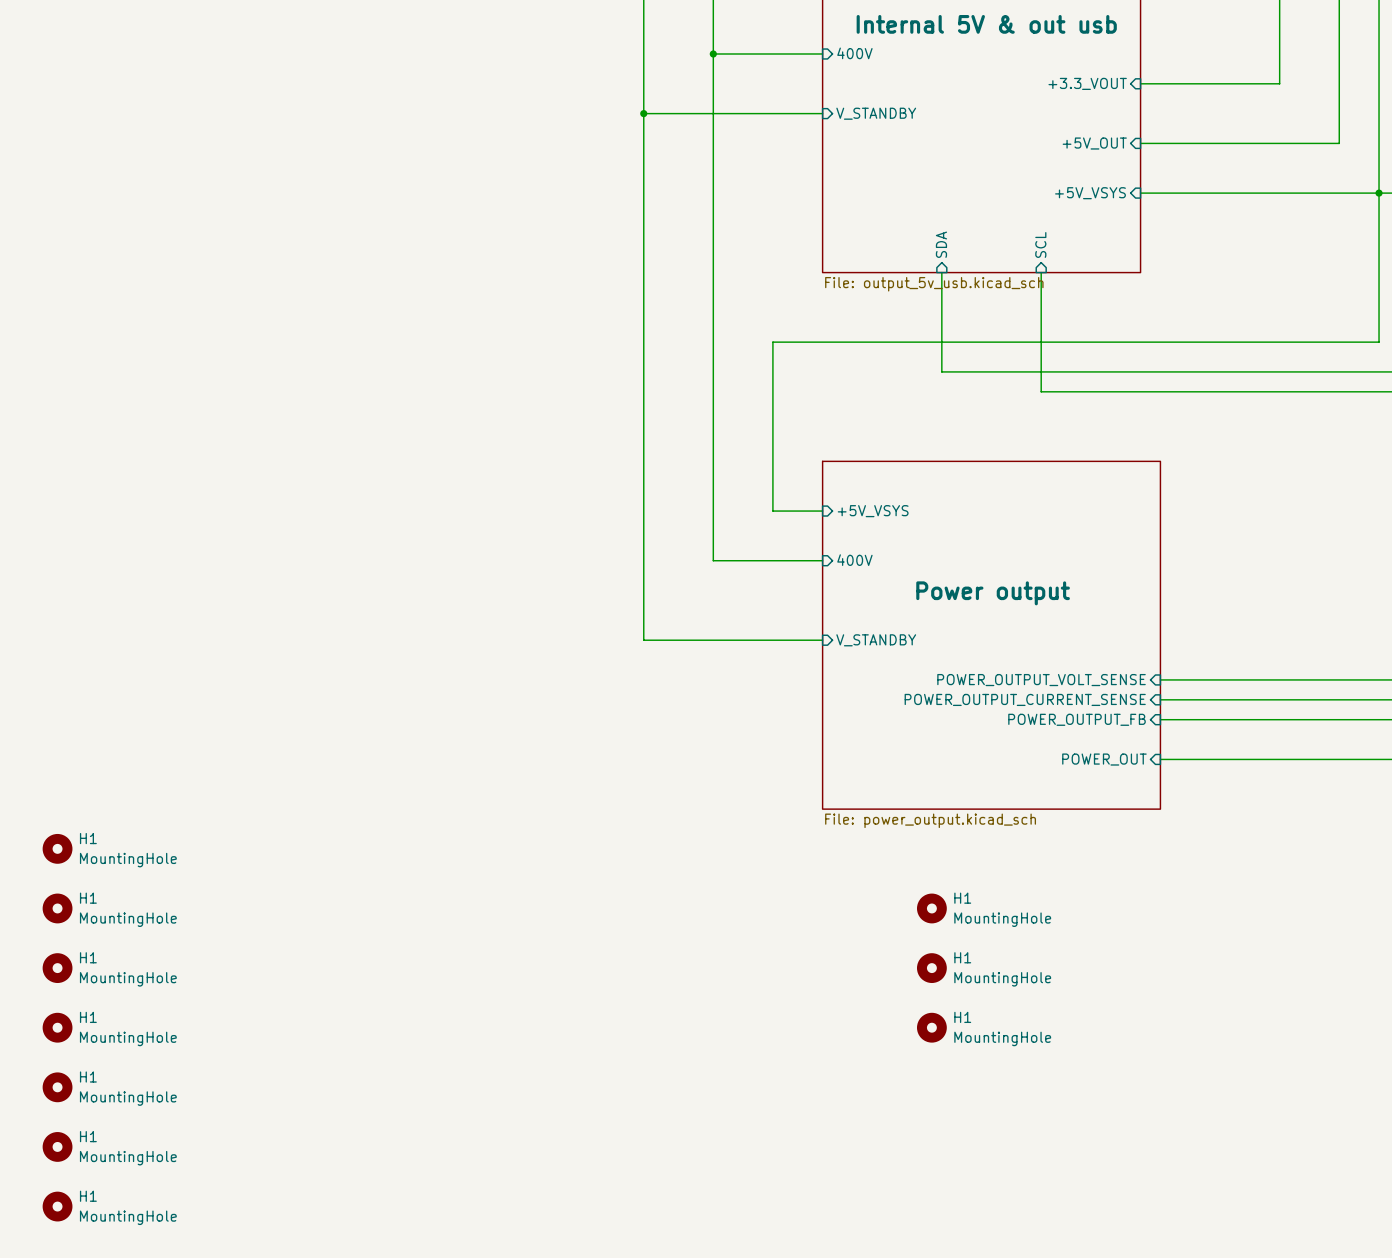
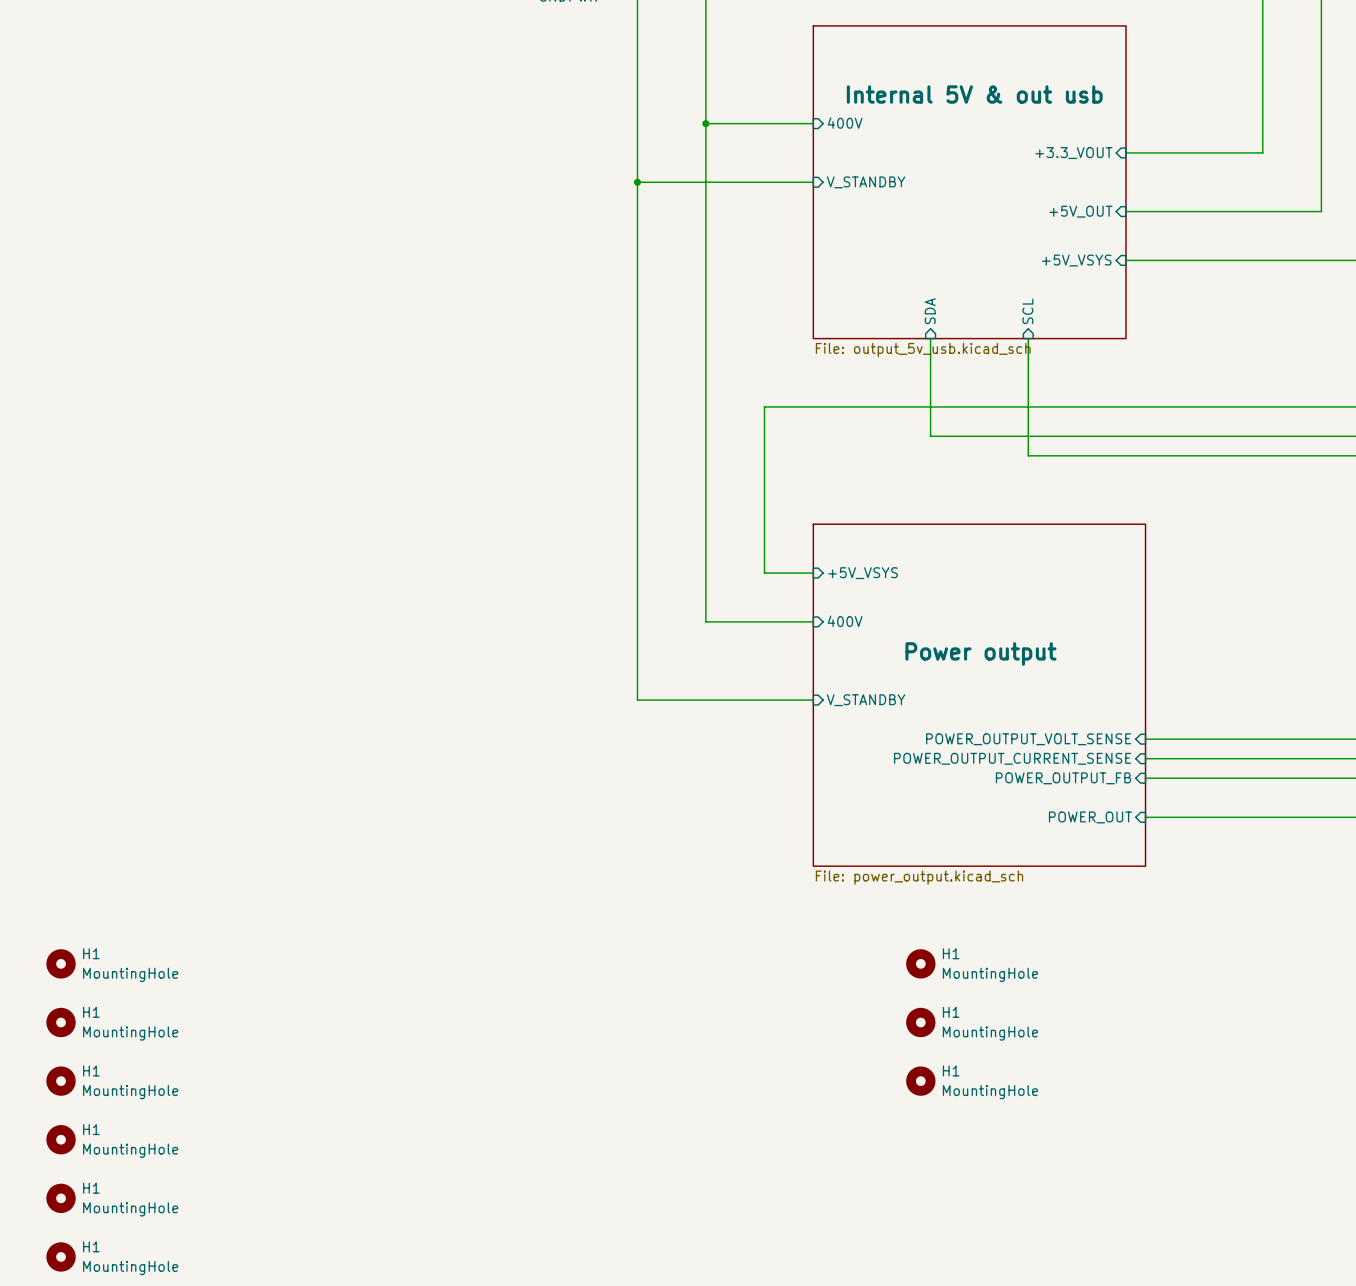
H1: MountingHole (57, 848) -> none

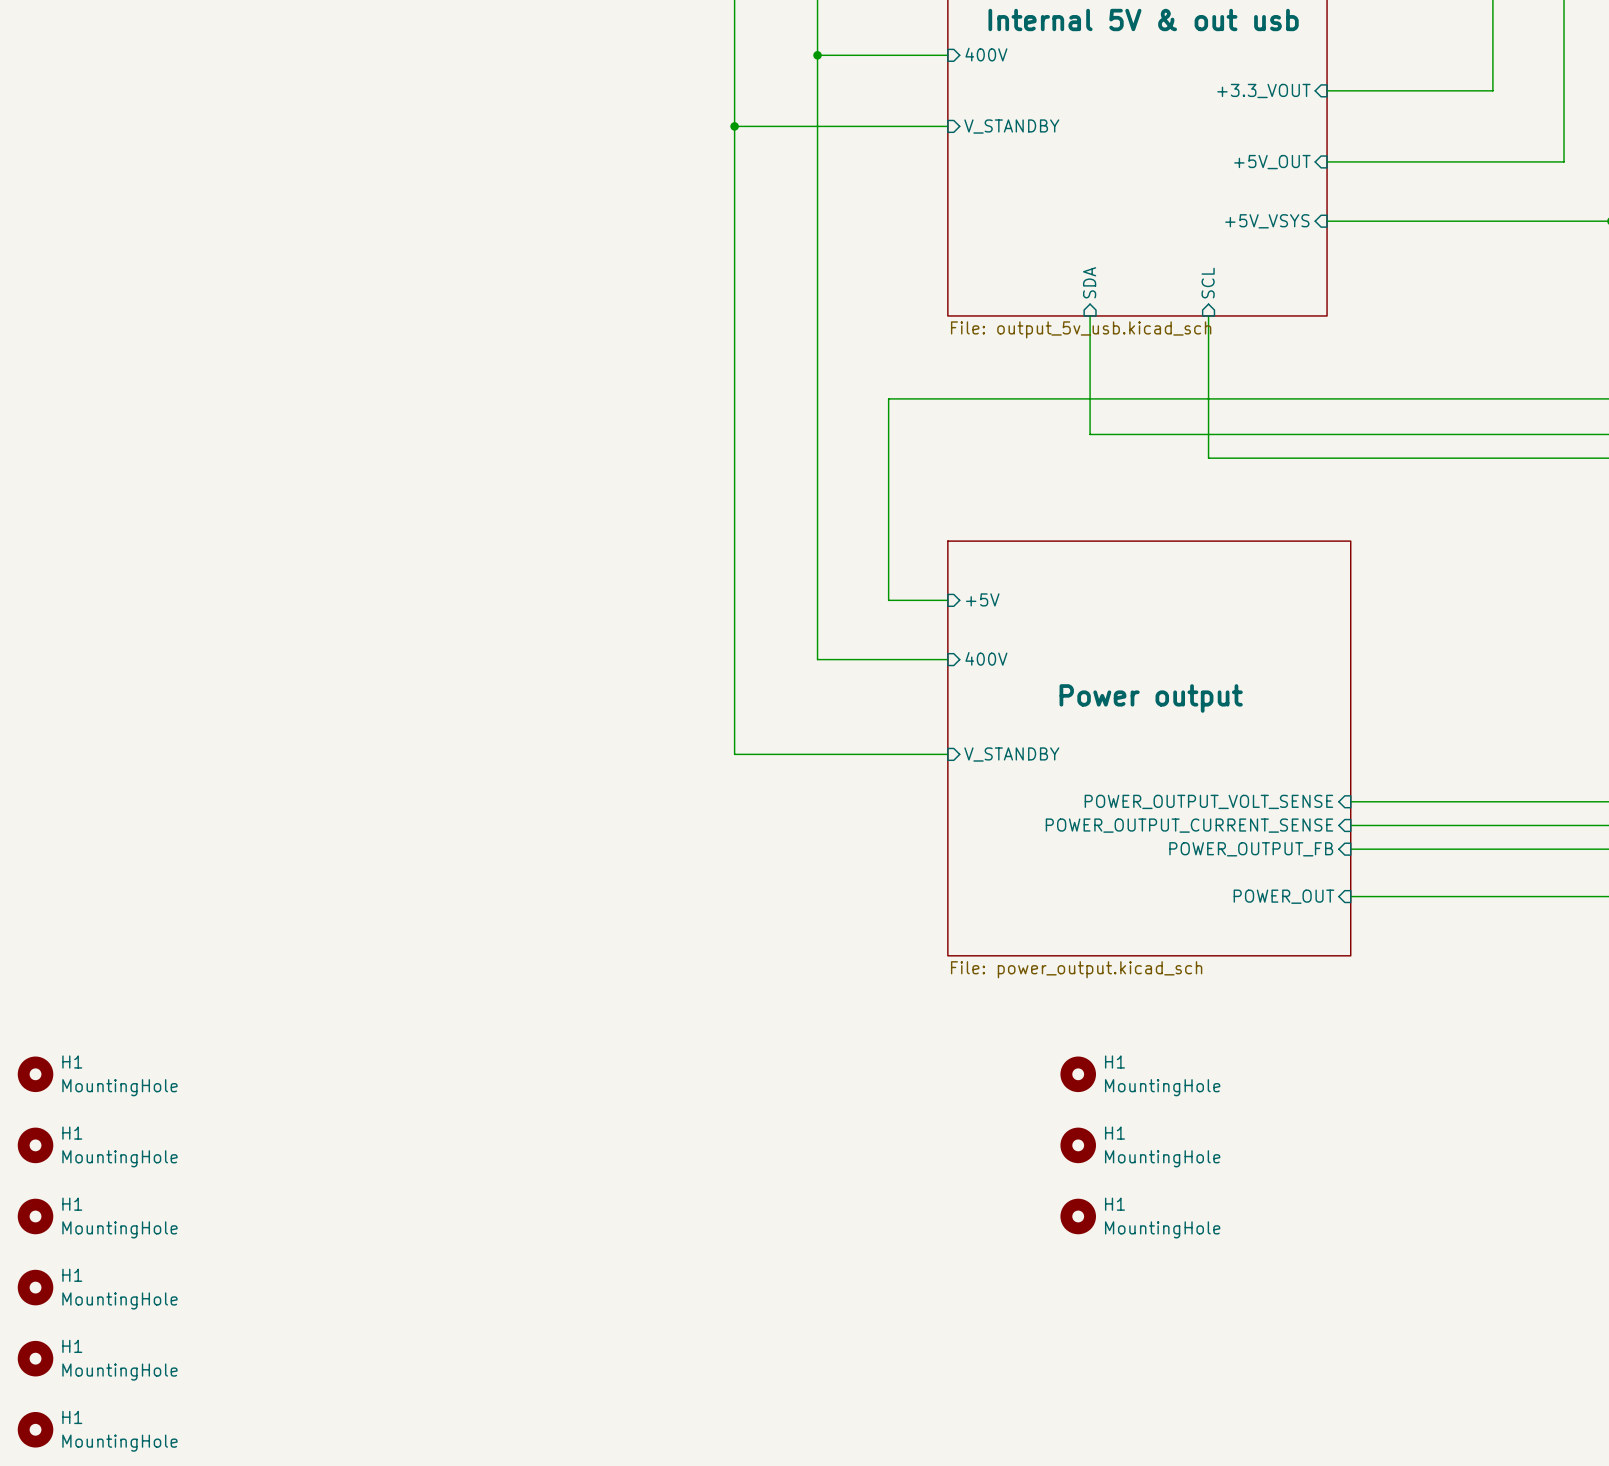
sheet pin: +5V_VSYS (863, 573) -> +5V (982, 599)

